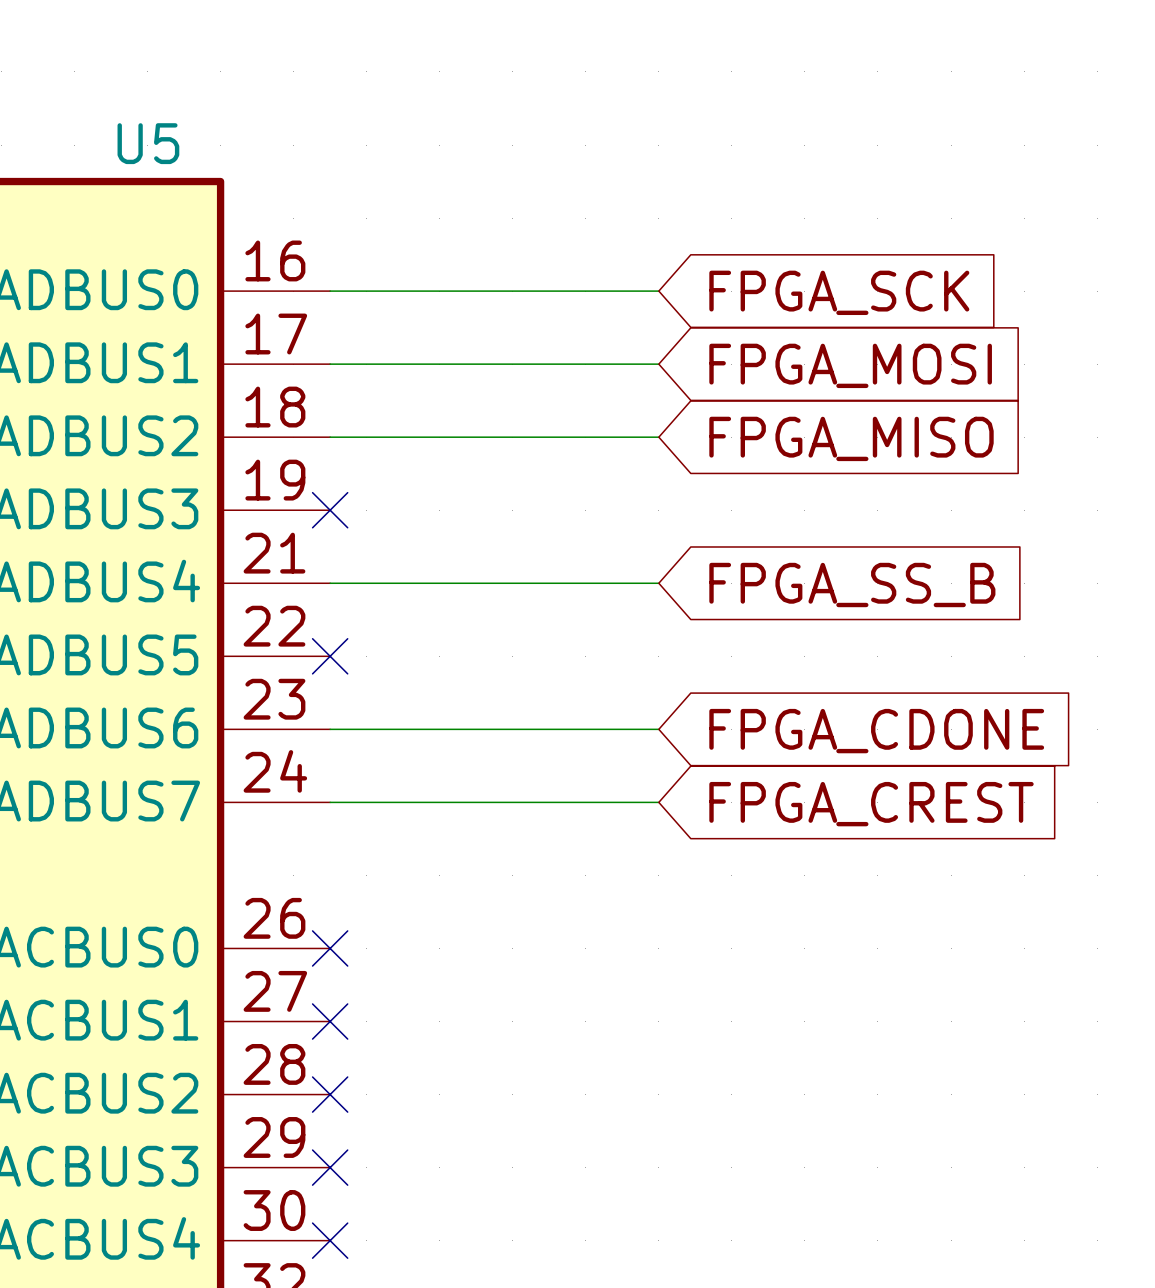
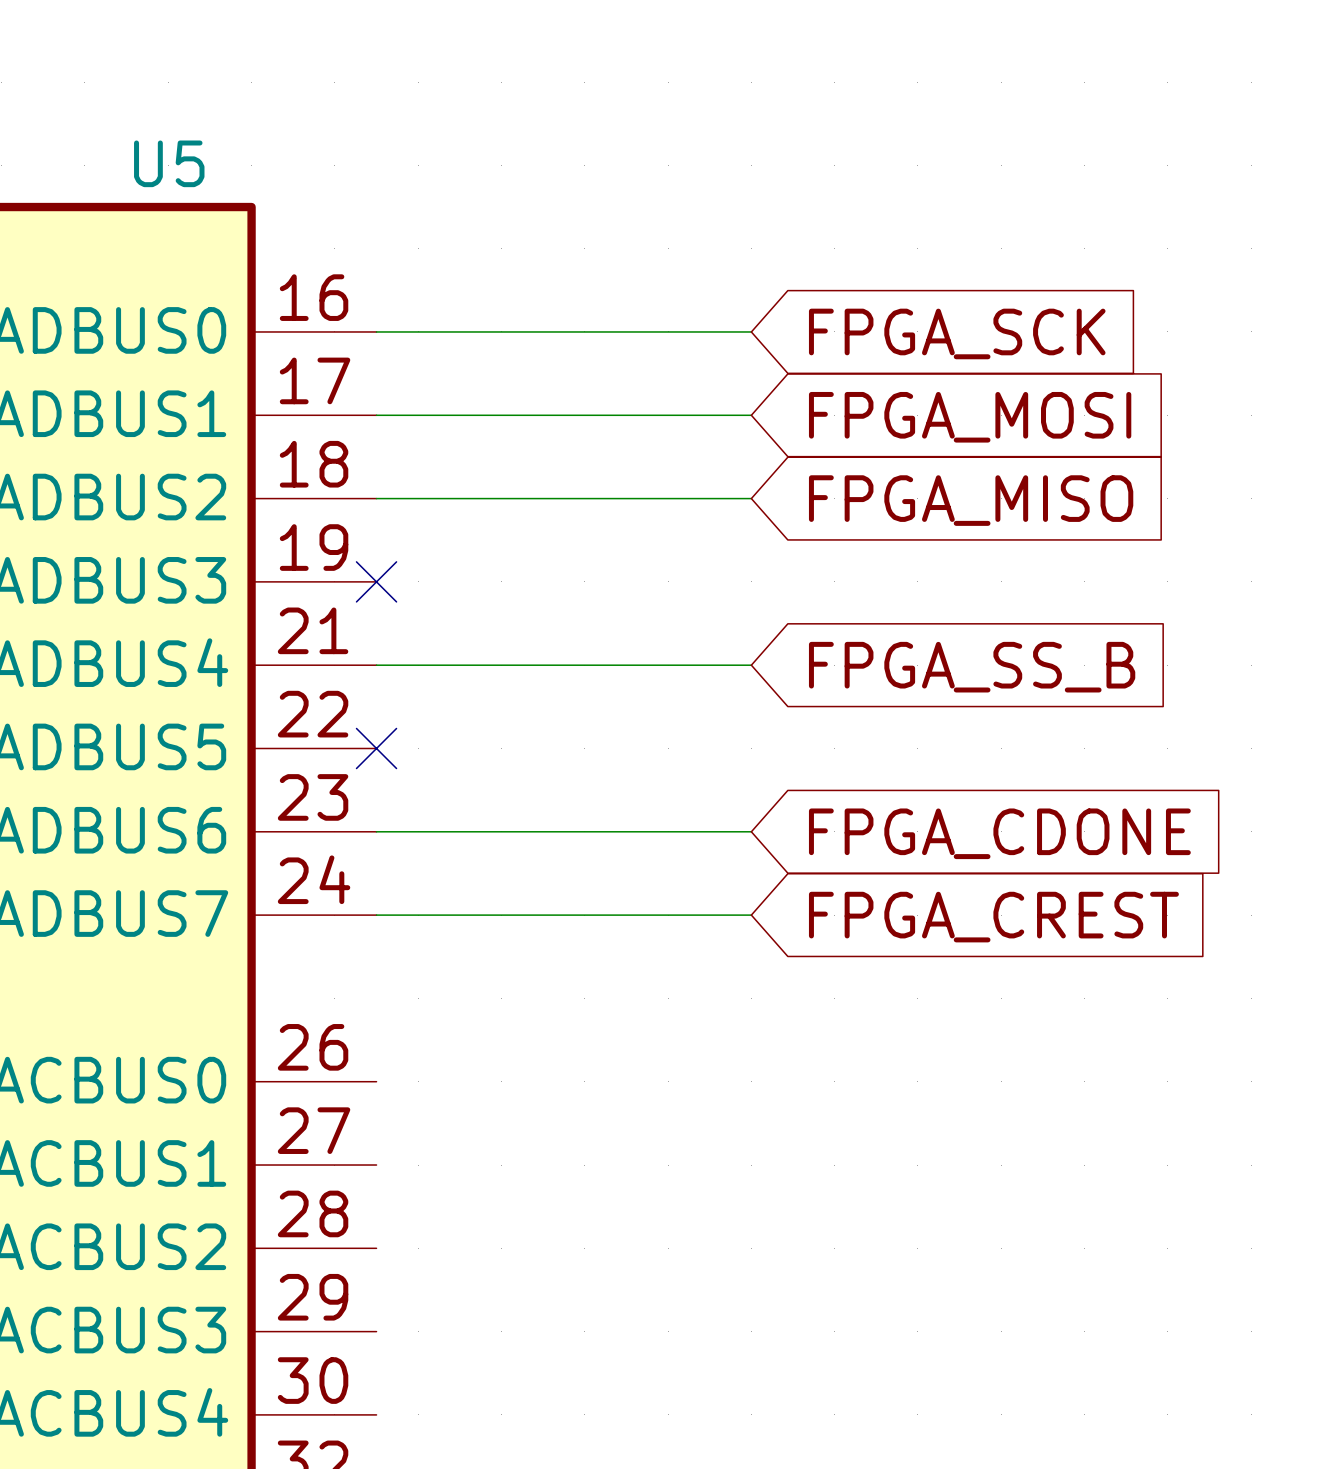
no-connect mark: (330, 948) -> none
no-connect mark: (330, 1021) -> none
no-connect mark: (330, 1094) -> none
no-connect mark: (330, 1167) -> none
no-connect mark: (330, 1240) -> none

